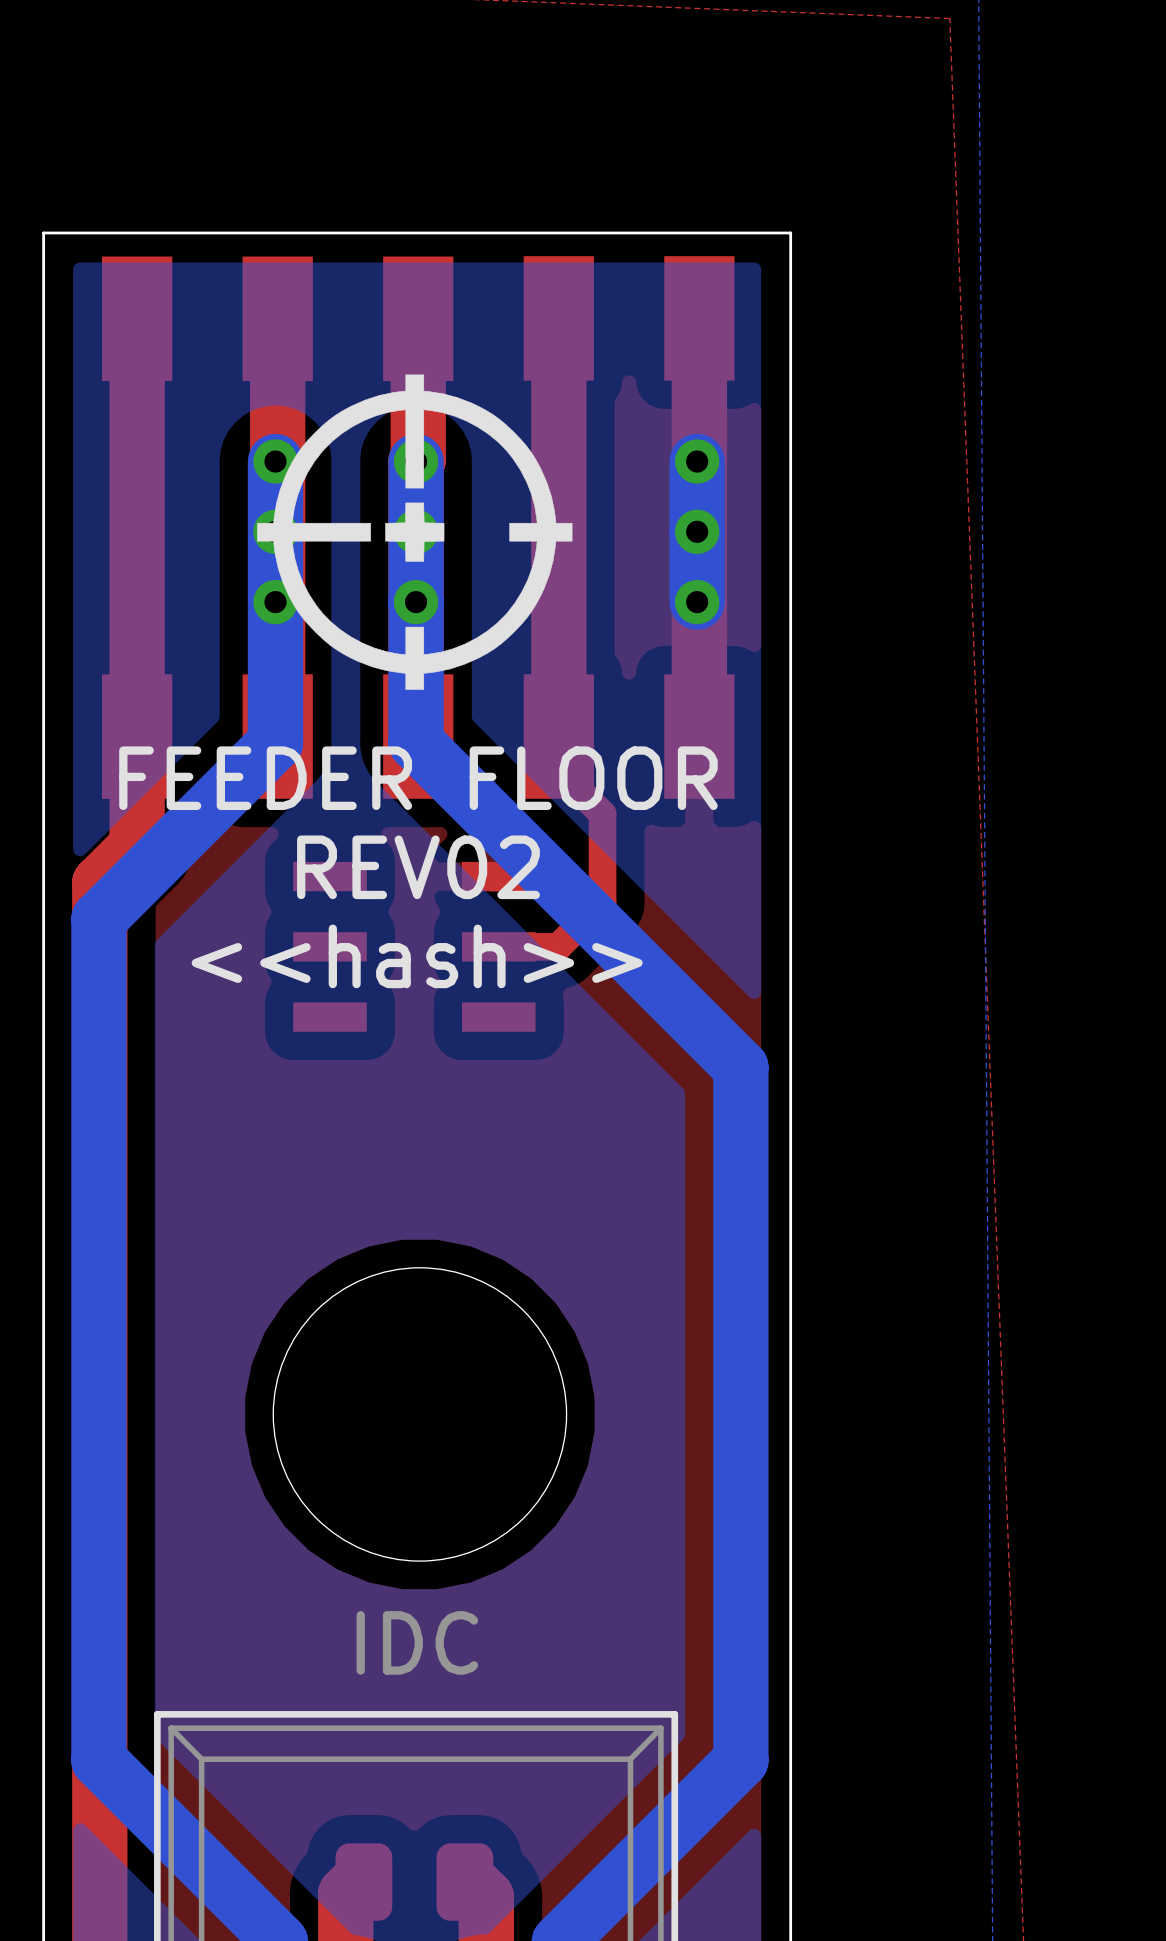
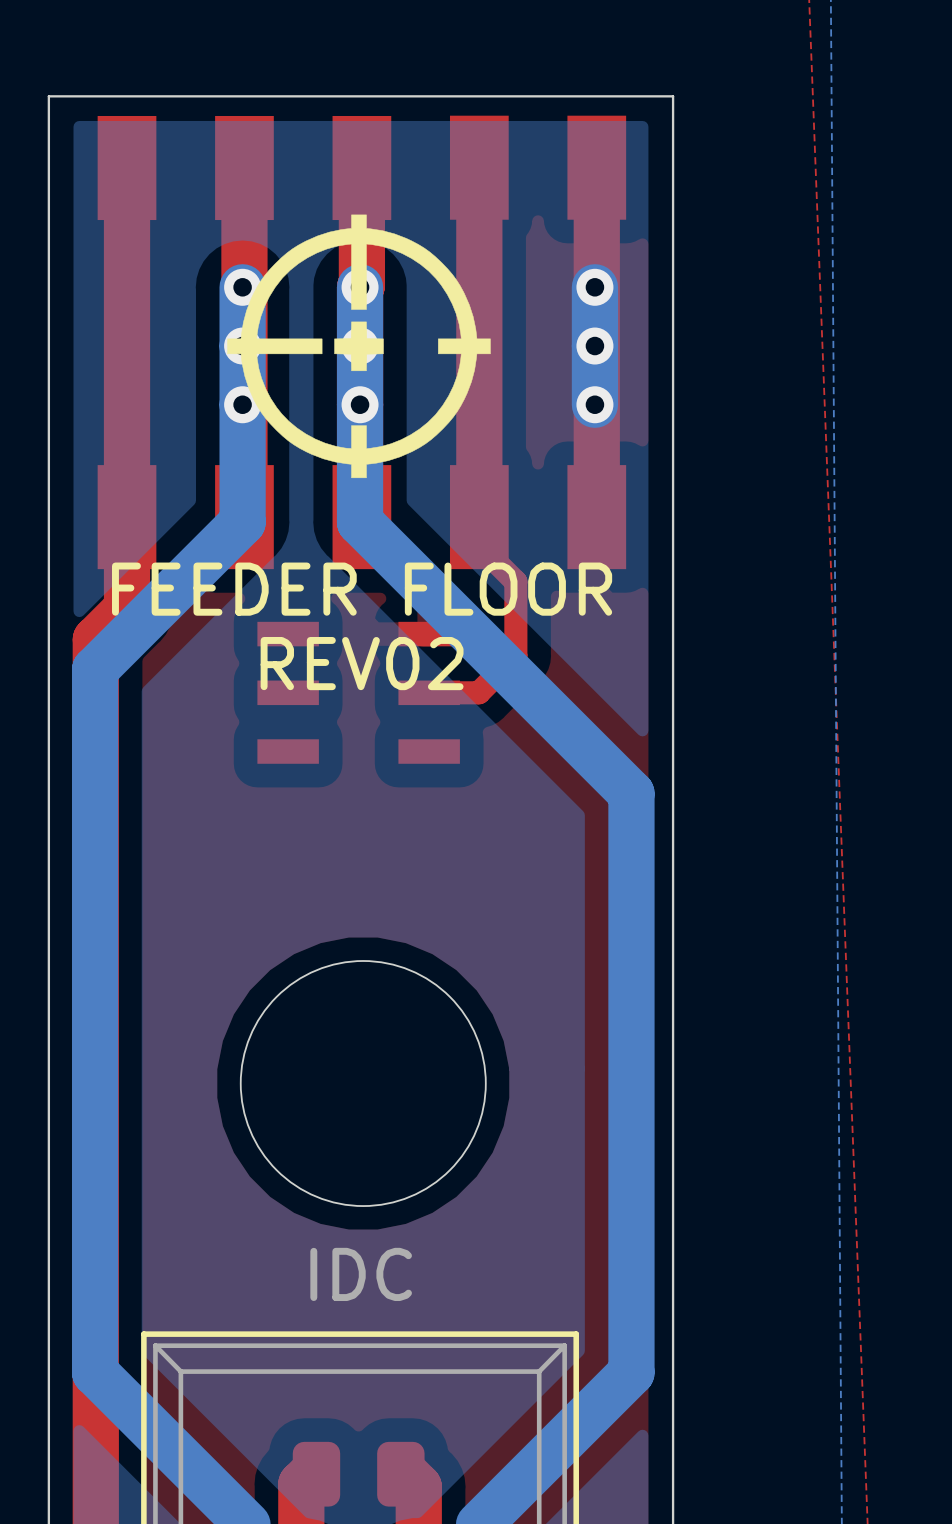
text position: FEEDER FLOOR (418, 778) -> FEEDER FLOOR (362, 589)
text position: REV02 (418, 867) -> REV02 (362, 663)
text: <<hash>> (417, 956) -> none

